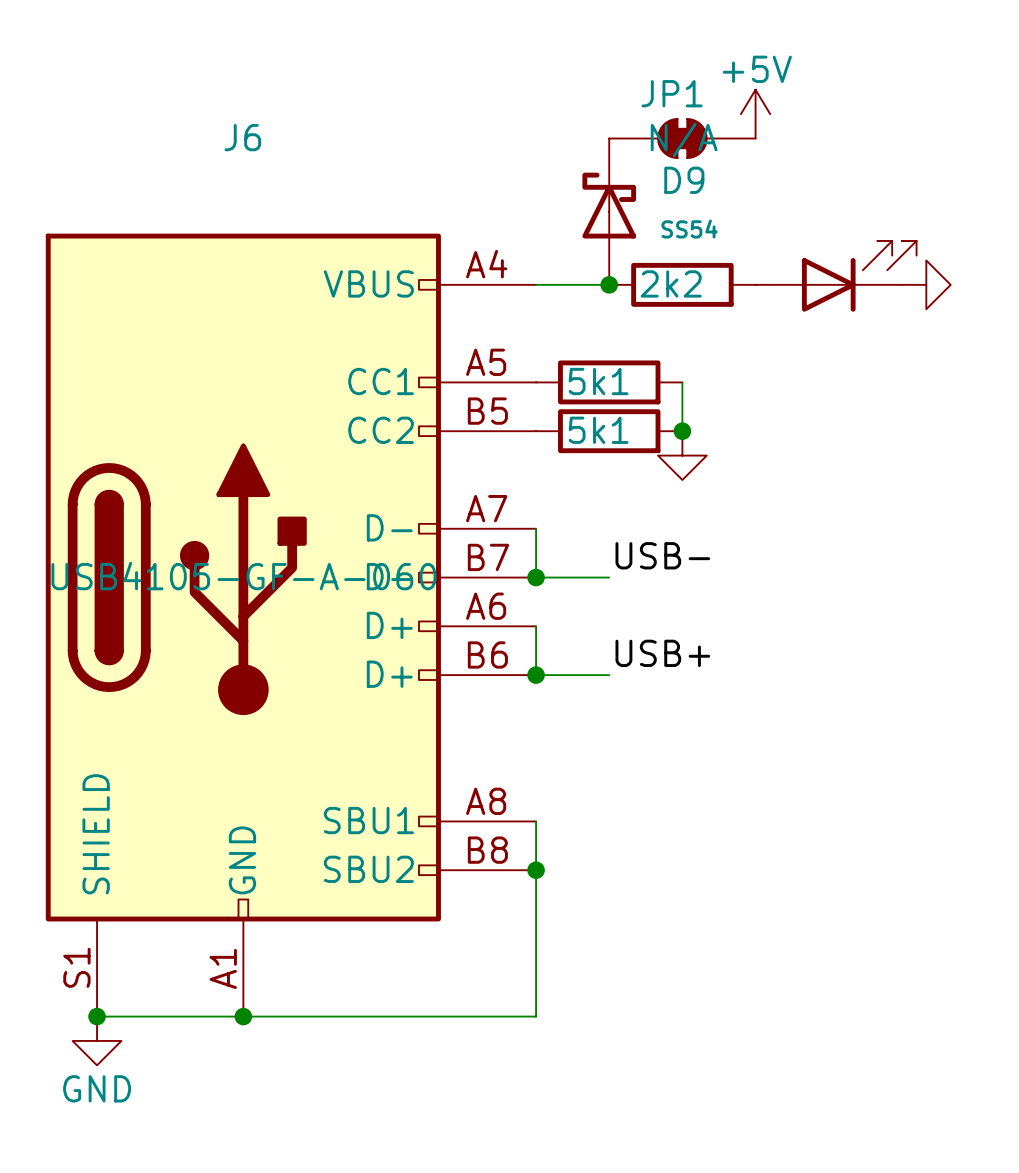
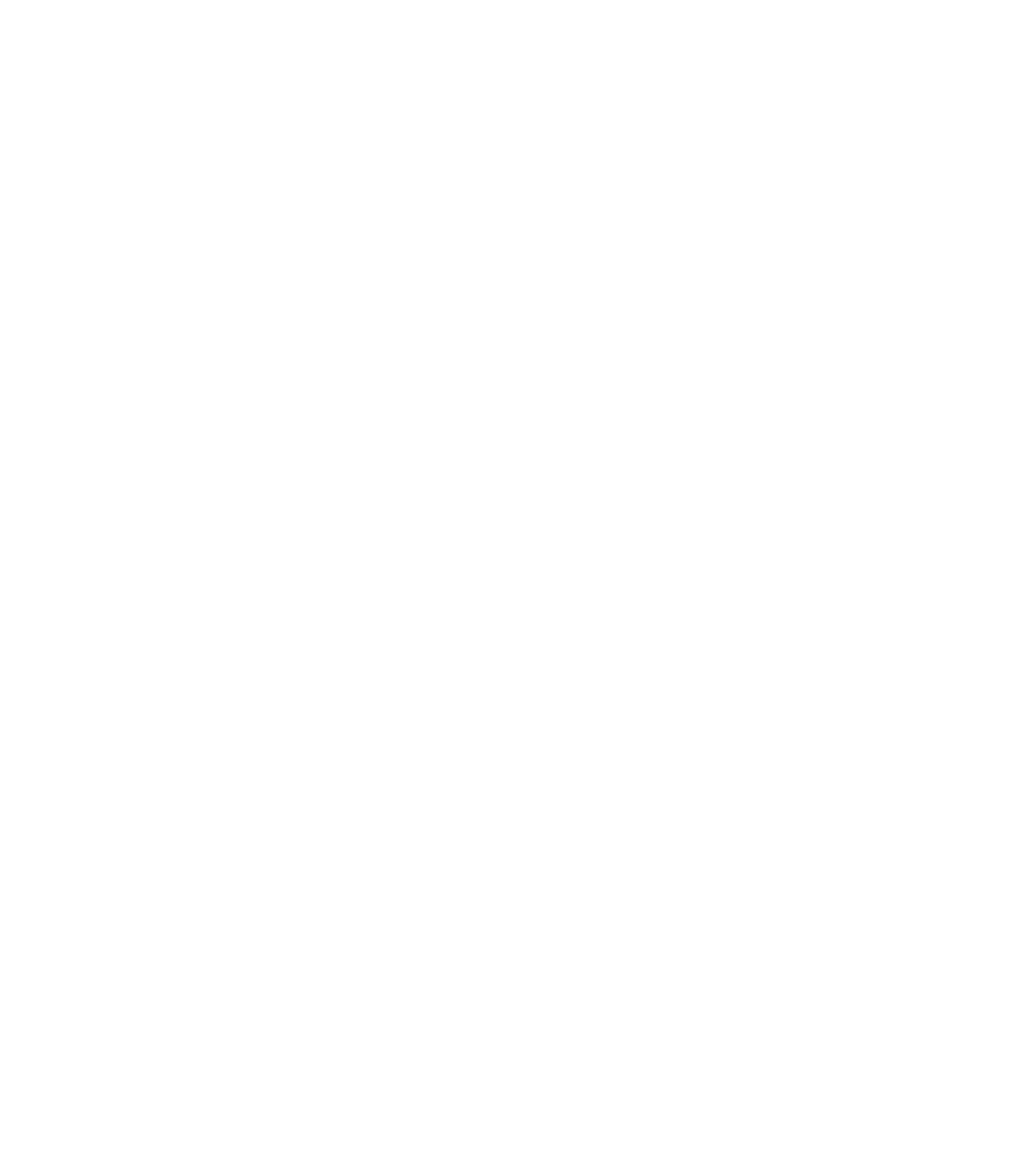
power symbol: +5V (755, 114) -> none
JP1: (682, 138) -> none
D9: SS54 (609, 211) -> none
part: (836, 276) -> none
wire: (536, 284) (609, 284) -> none
junction: (609, 284) -> none
part: 2k2 (682, 284) -> none
power symbol: (926, 284) -> none
part: 5k1 (609, 382) -> none
wire: (682, 382) (682, 431) -> none
part: 5k1 (609, 431) -> none
junction: (682, 431) -> none
power symbol: (682, 455) -> none
wire: (536, 528) (536, 577) (609, 577) -> none
label: USB- (662, 555) -> none
junction: (536, 577) -> none
J6: (290, 625) -> none
wire: (536, 626) (536, 675) (609, 675) -> none
label: USB+ (662, 653) -> none
junction: (536, 675) -> none
wire: (536, 821) (536, 1016) (97, 1016) -> none
junction: (536, 870) -> none
junction: (97, 1016) -> none
junction: (243, 1016) -> none
power symbol: GND (97, 1040) -> none

